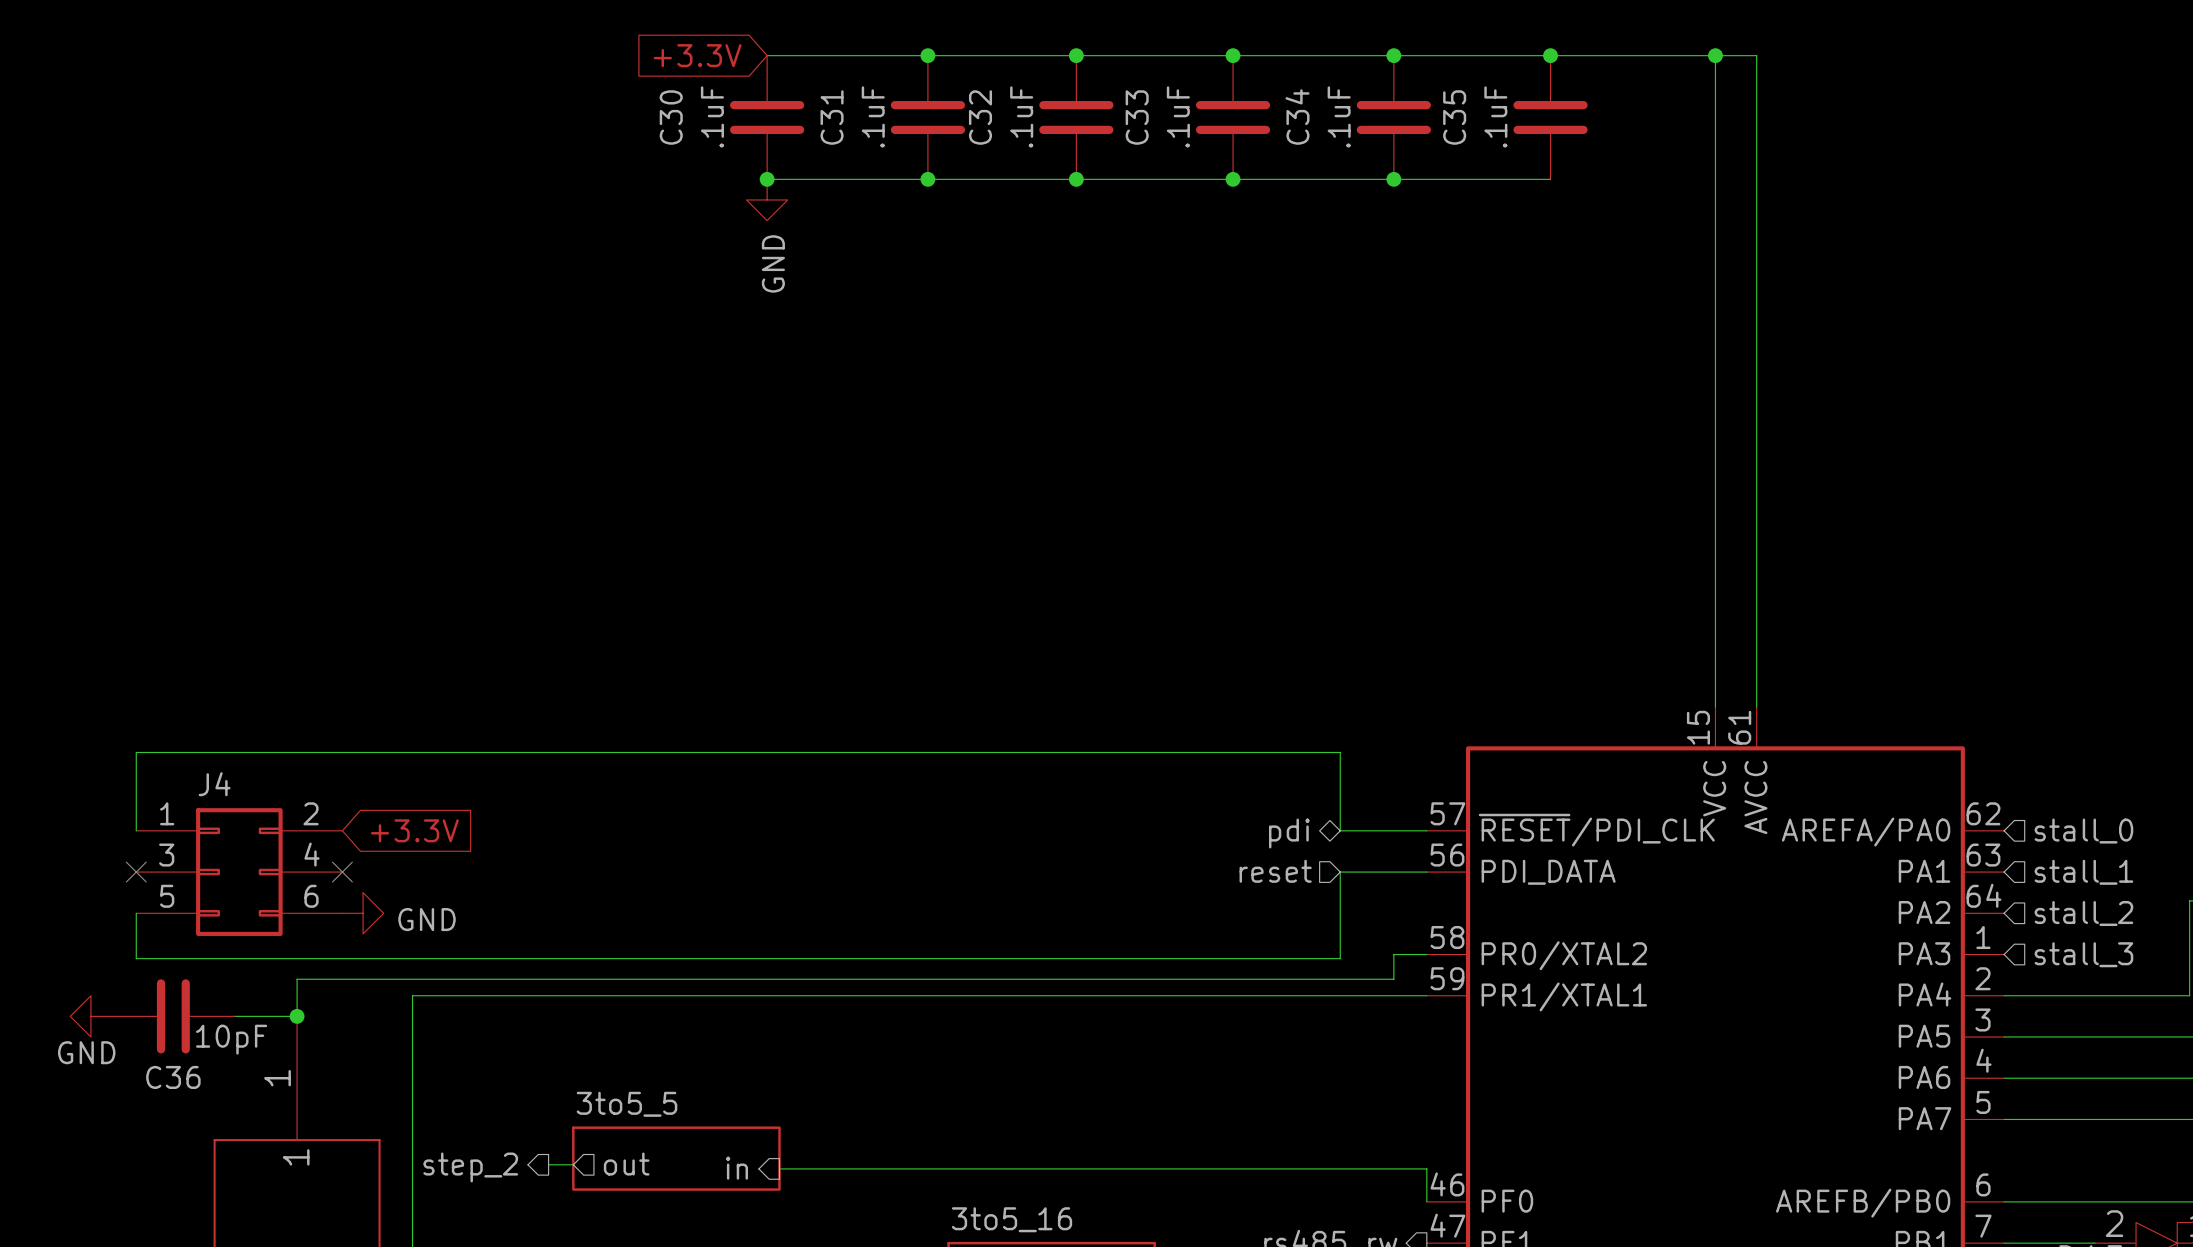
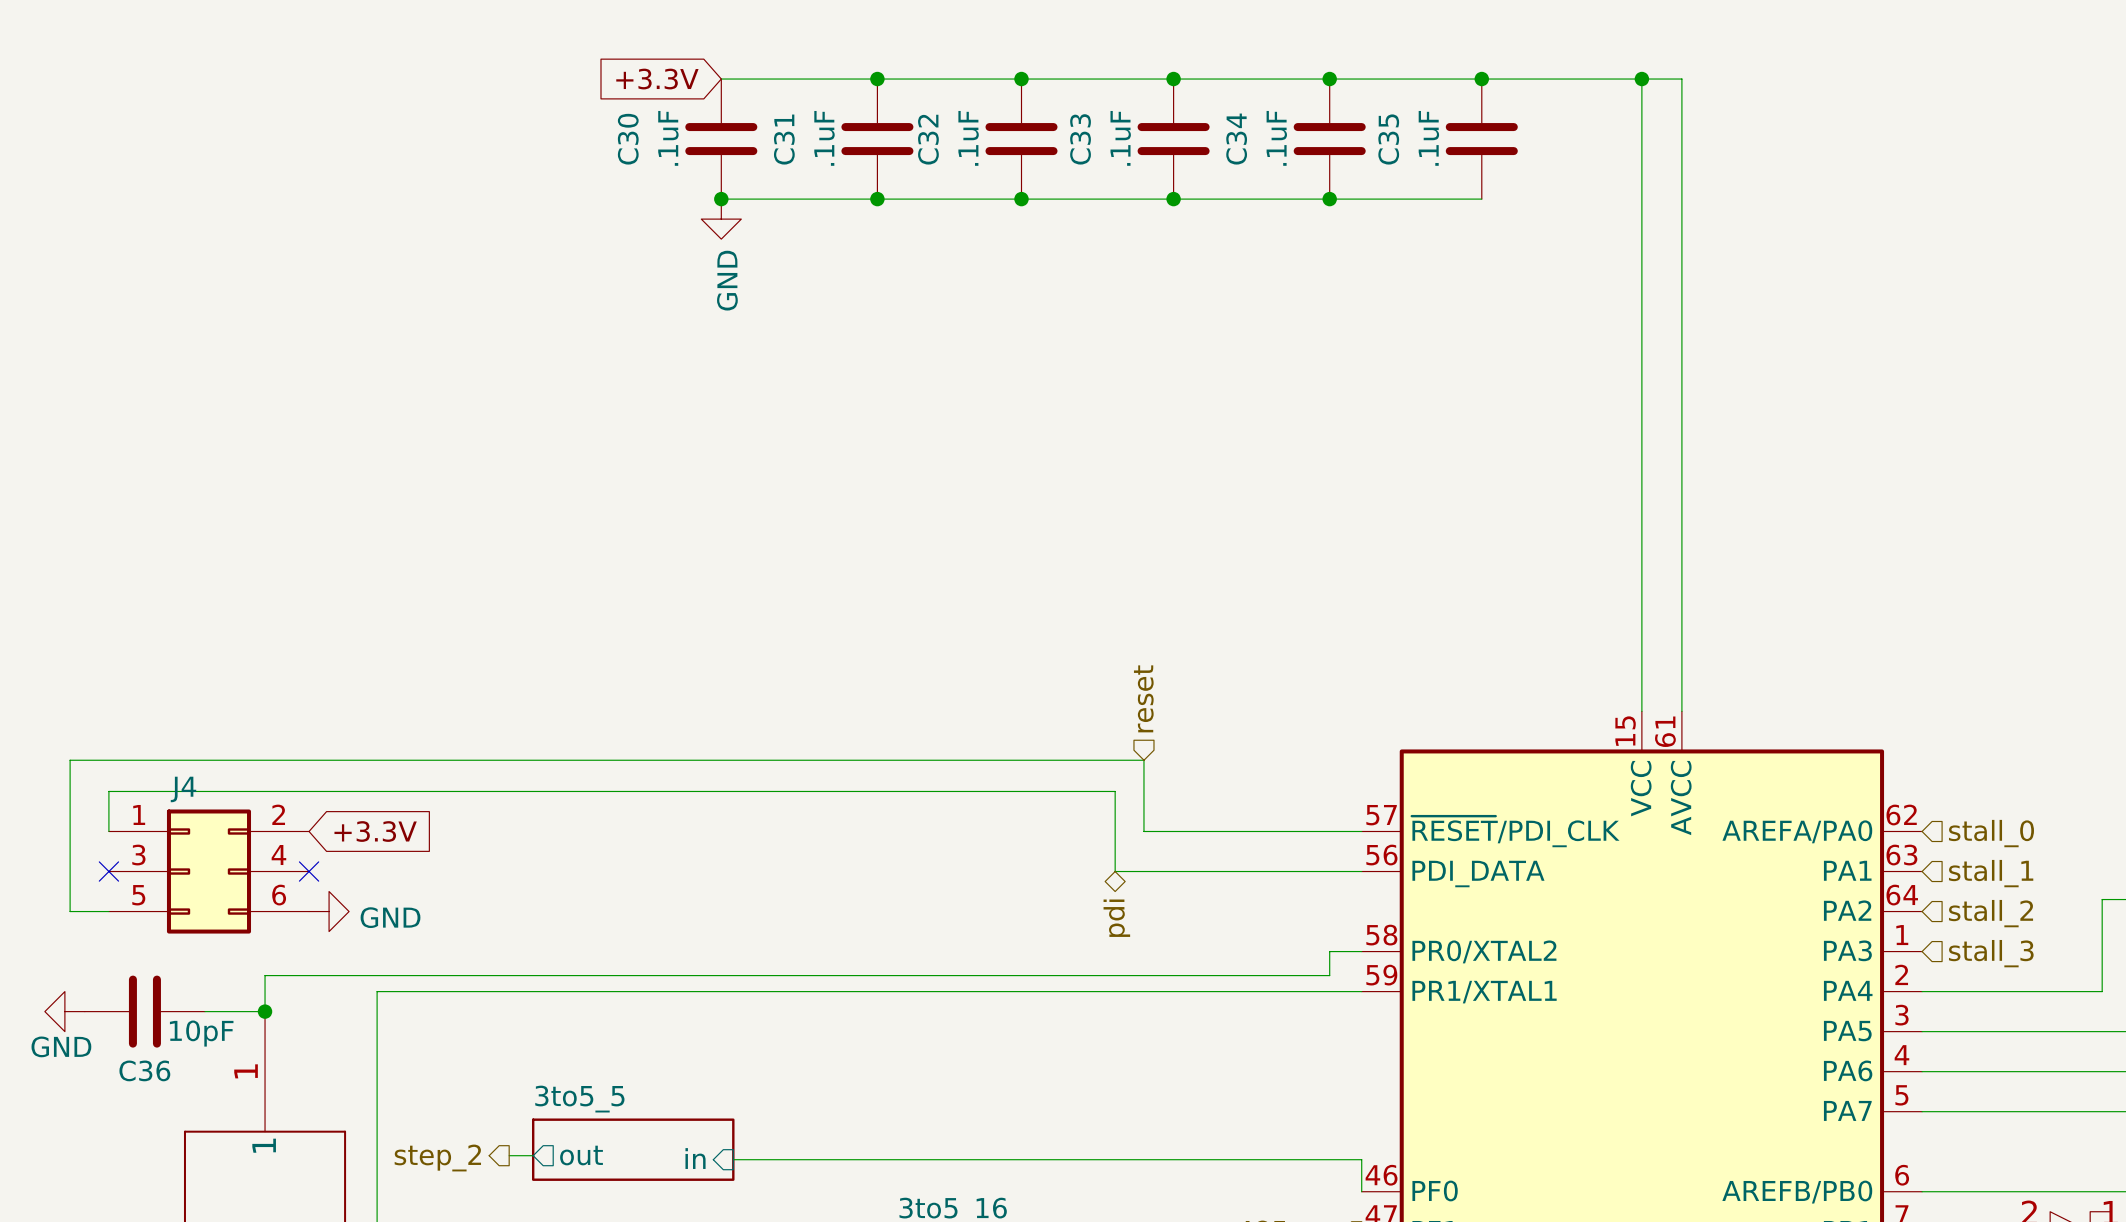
wire: (136, 789) (136, 752) (1340, 752) (1340, 830) -> (108, 791) (1115, 791) (1115, 871) (1277, 871)
hierarchical label rotation: 0° (1289, 833) -> 90° counterclockwise (1116, 918)
hierarchical label position: pdi (1289, 833) -> pdi (1116, 918)
hierarchical label rotation: 0° (1275, 871) -> 90° clockwise (1143, 698)
hierarchical label position: reset (1275, 871) -> reset (1143, 698)
wire: (1340, 872) (1340, 958) (136, 958) (136, 913) -> (1277, 831) (1143, 831) (1143, 760) (70, 760) (70, 911) (108, 911)

